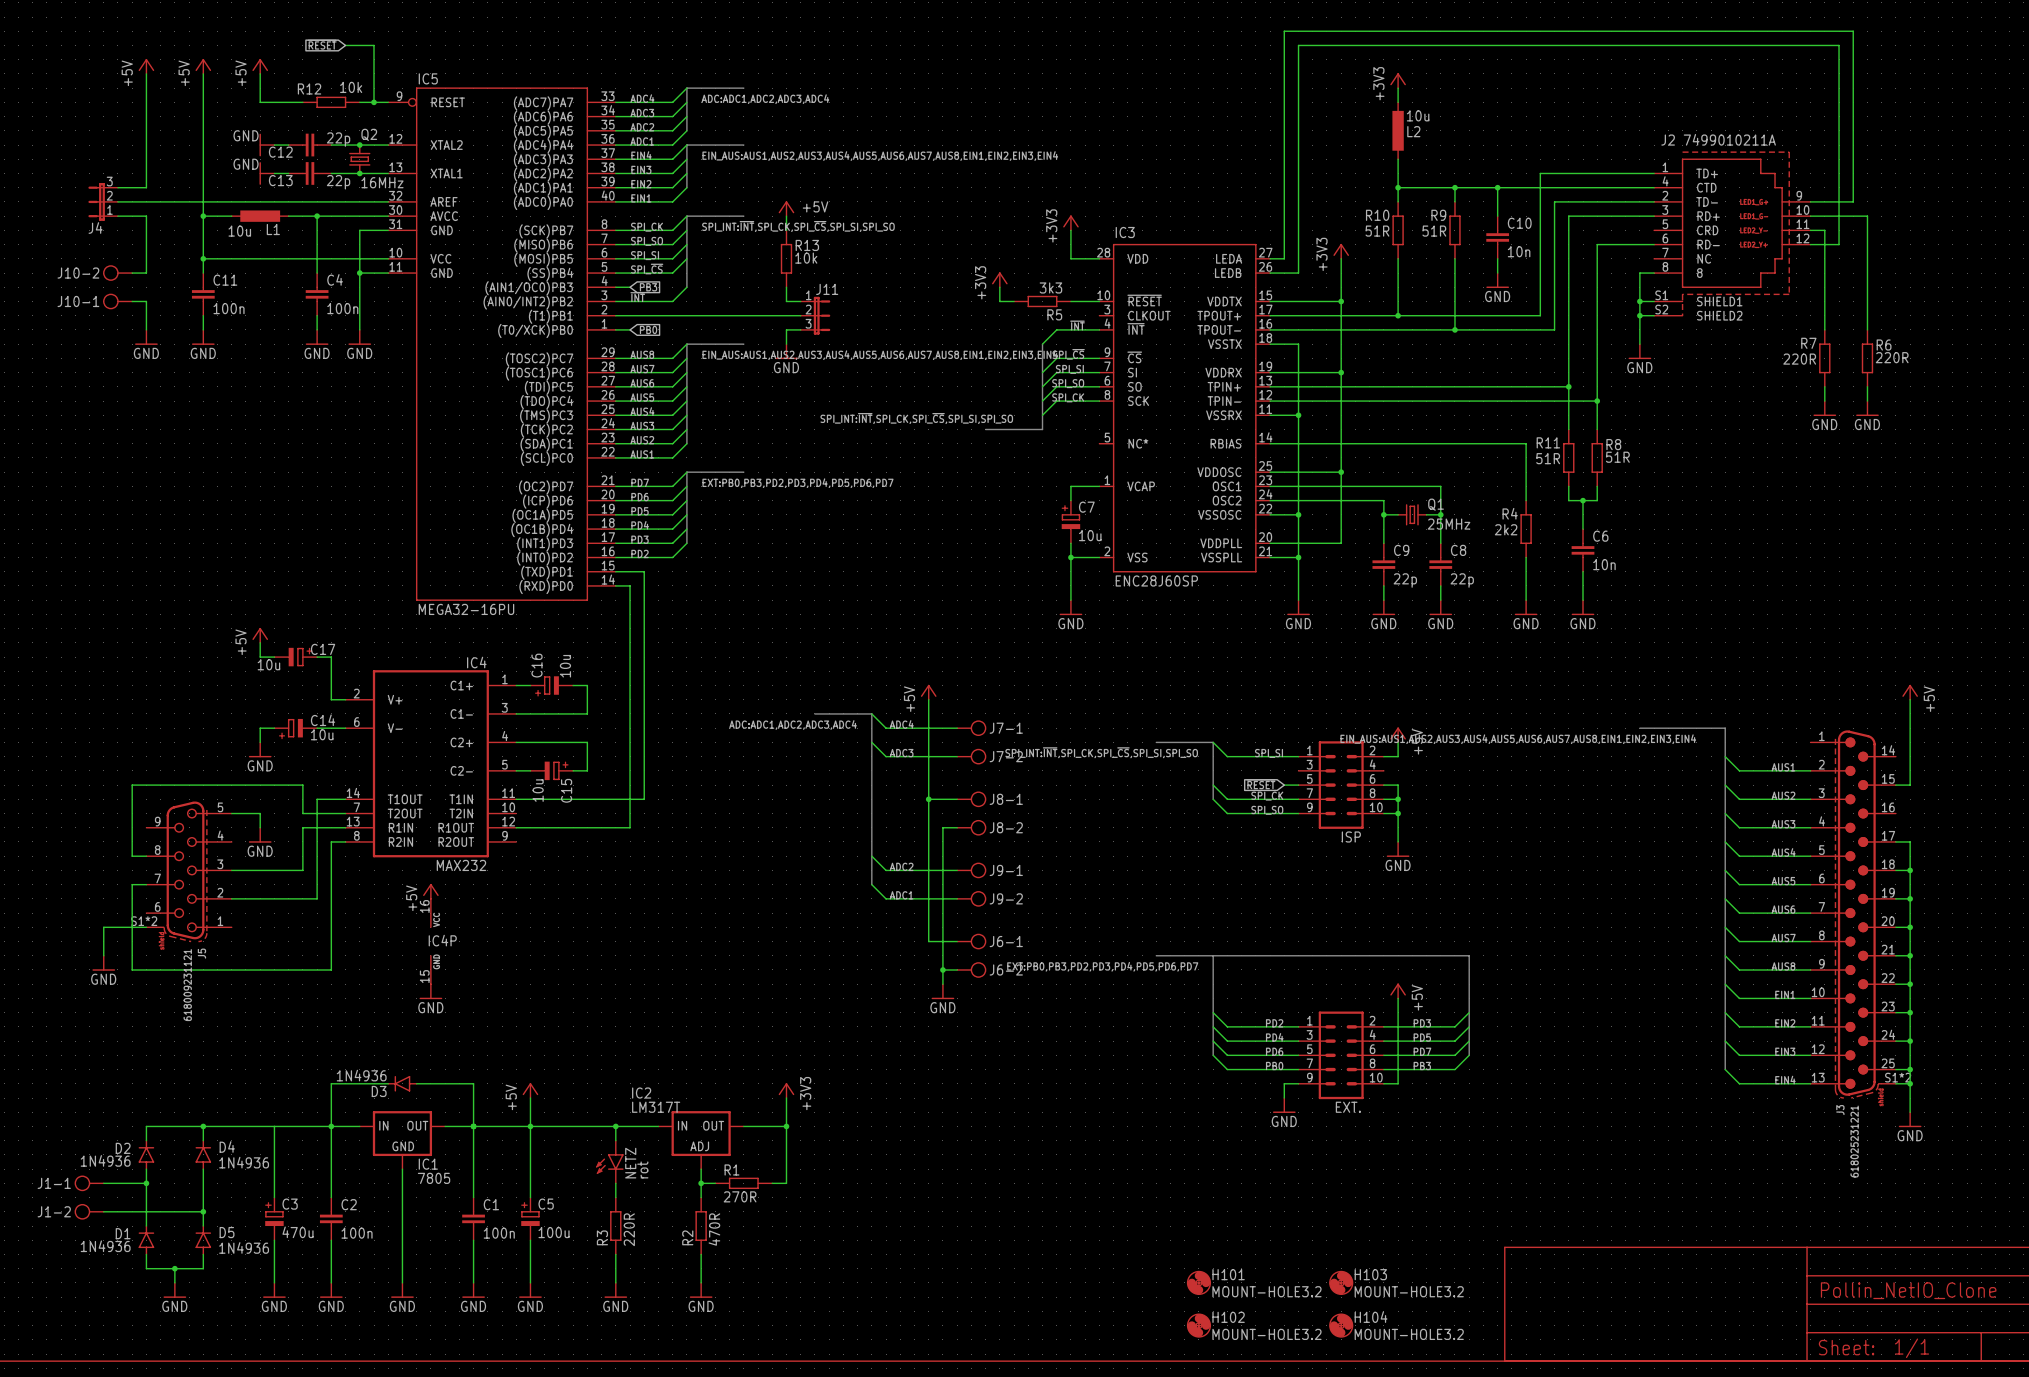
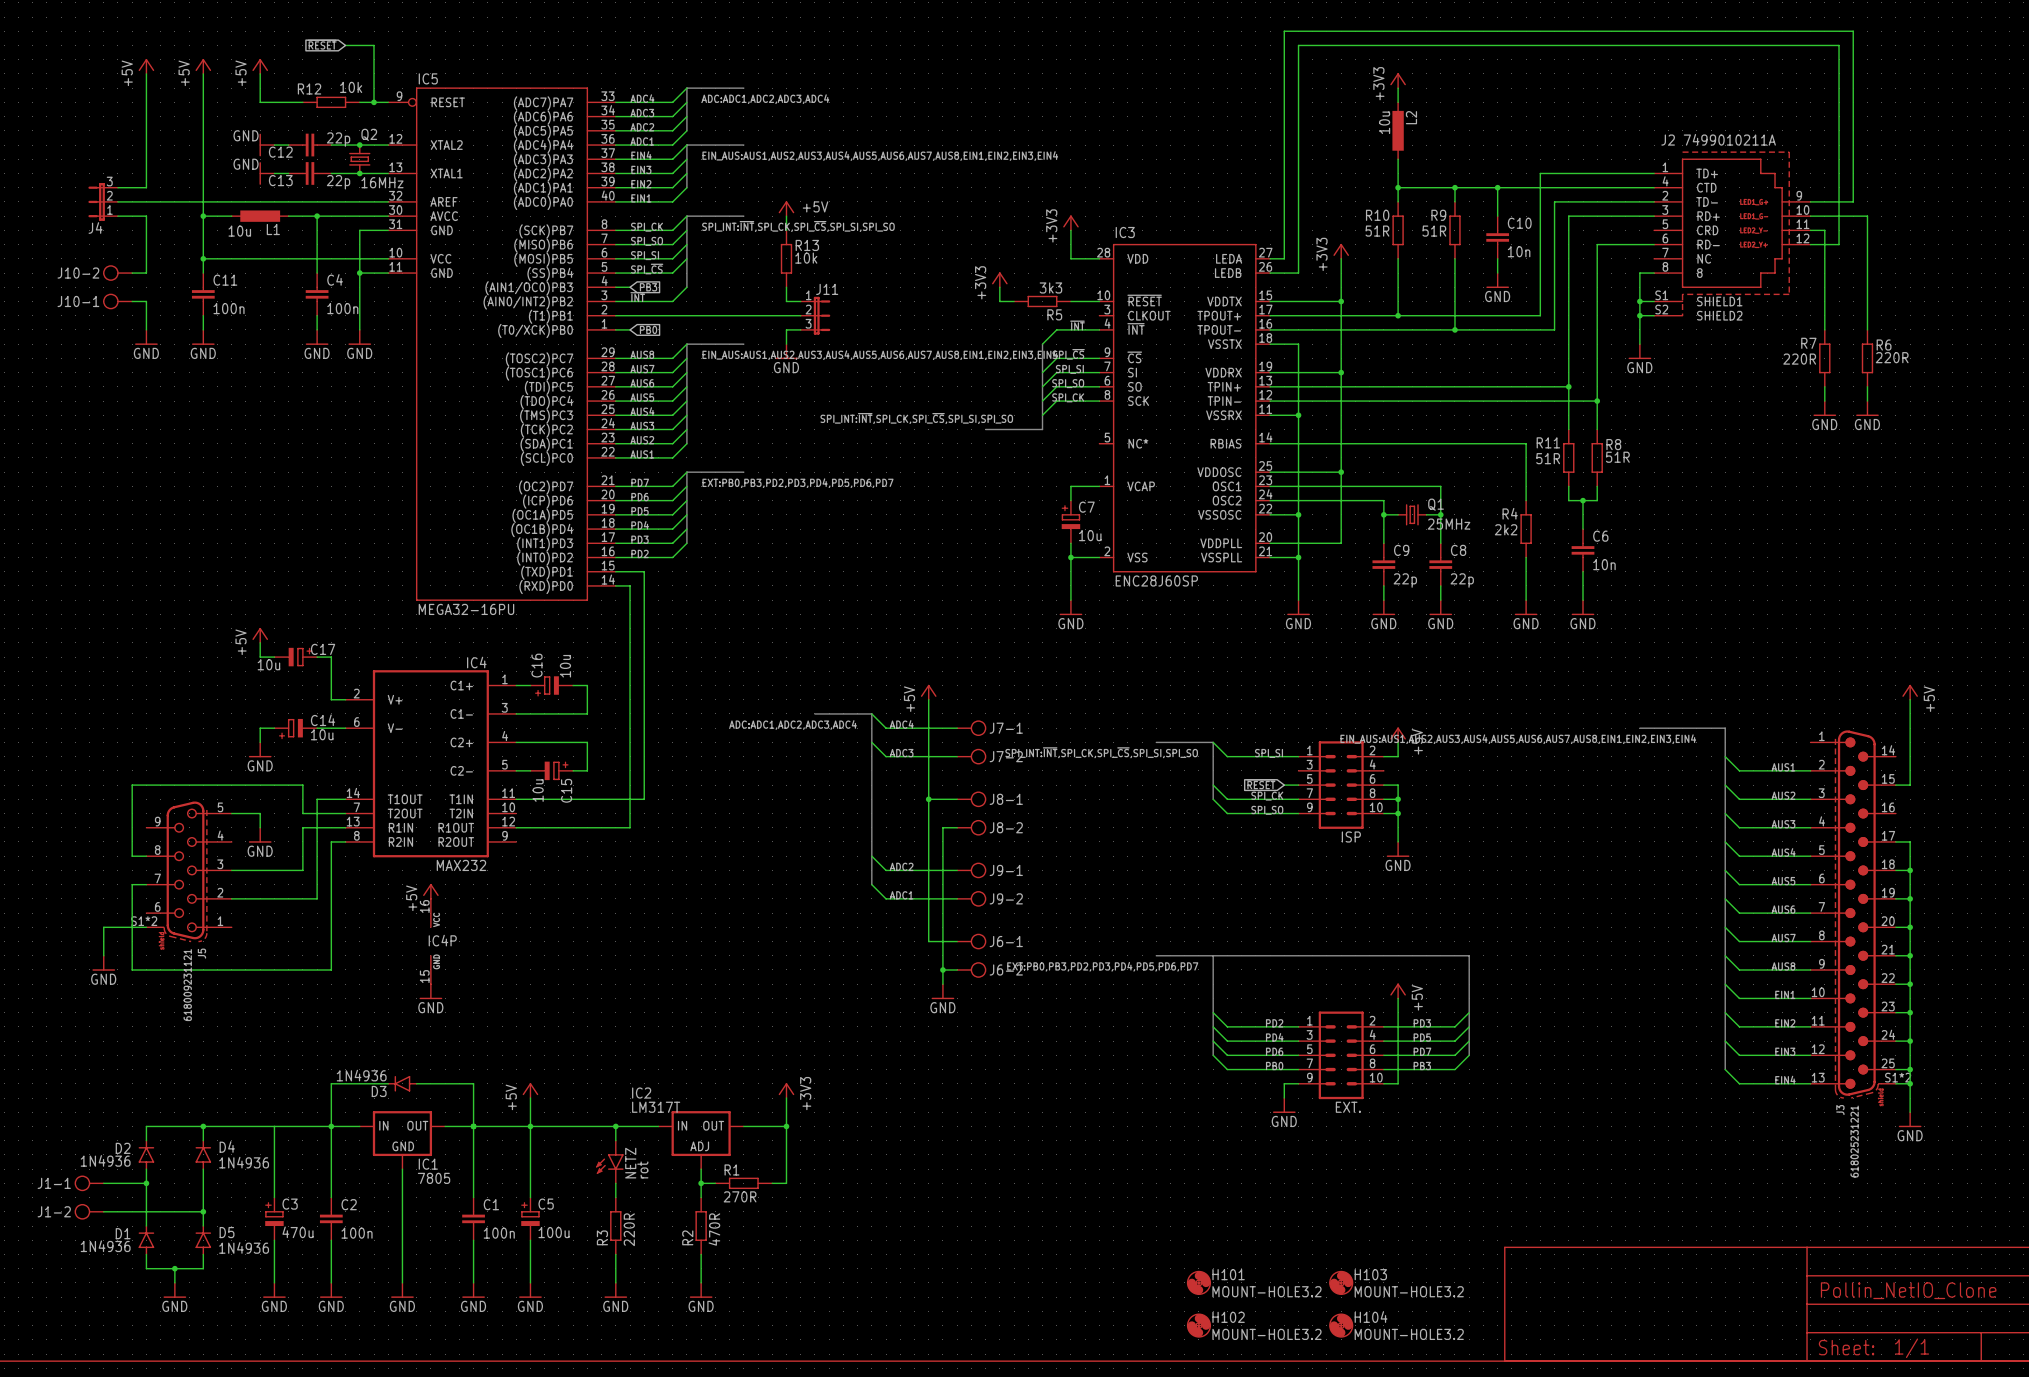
L2 value rotation: 0° (1418, 115) -> 90° counterclockwise (1384, 122)
L2 value position: 10u (1418, 115) -> 10u (1384, 122)
L2 name rotation: 0° (1413, 131) -> 90° counterclockwise (1411, 117)

